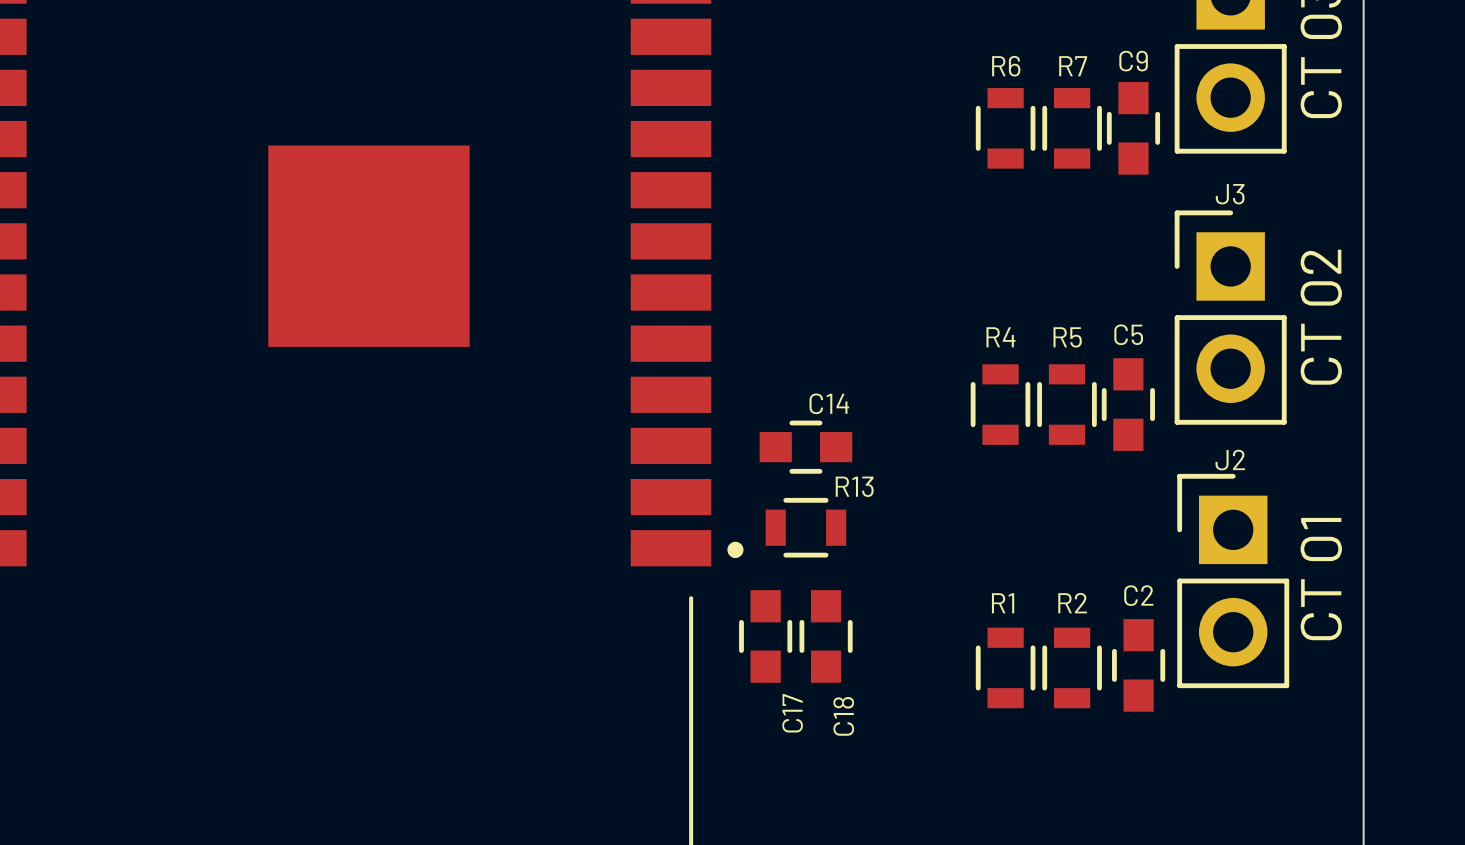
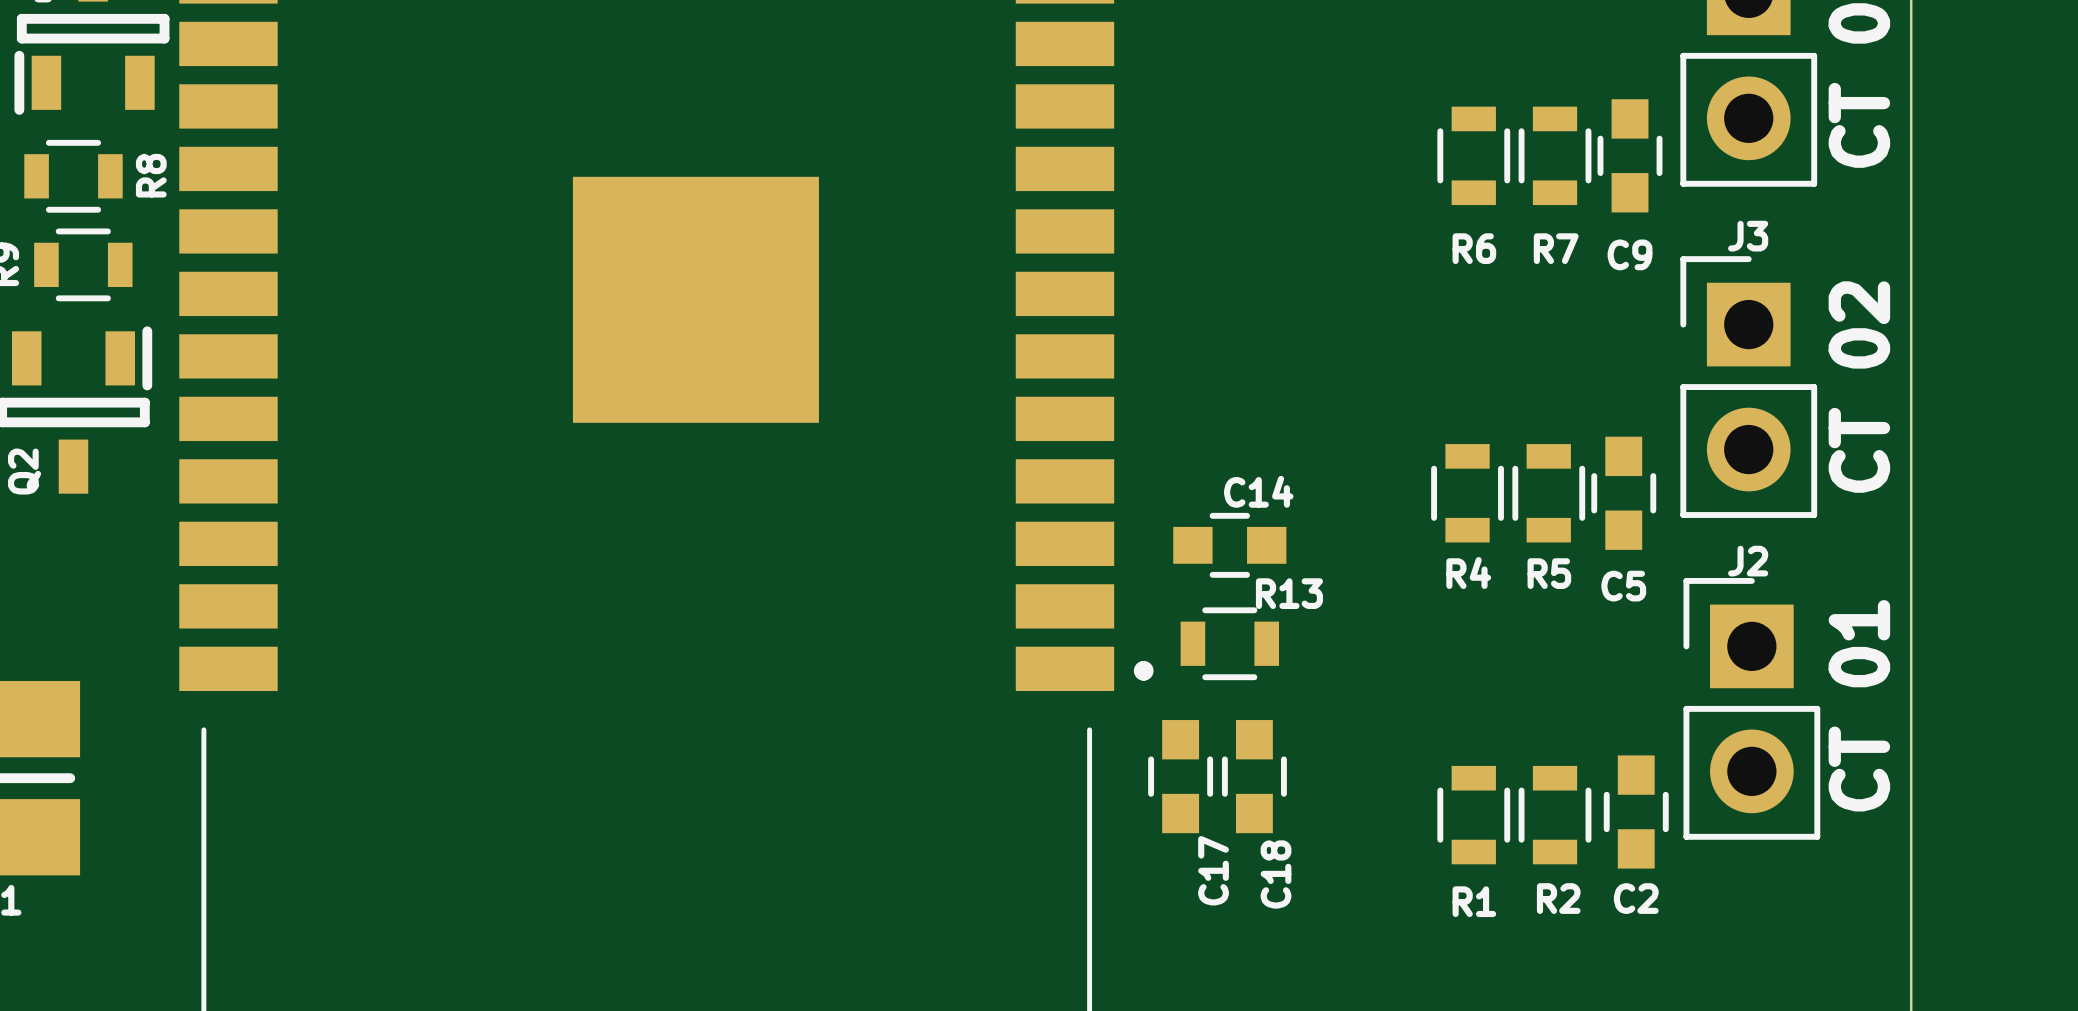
C9 name position: C9 (1133, 61) -> C9 (1630, 254)
R6 name position: R6 (1006, 66) -> R6 (1474, 248)
R7 name position: R7 (1073, 66) -> R7 (1556, 248)
C5 name position: C5 (1128, 334) -> C5 (1623, 586)
R4 name position: R4 (1000, 337) -> R4 (1468, 573)
R5 name position: R5 (1067, 337) -> R5 (1549, 573)
C2 name position: C2 (1138, 595) -> C2 (1636, 898)
R1 name position: R1 (1003, 603) -> R1 (1474, 901)
R2 name position: R2 (1072, 603) -> R2 (1558, 898)

